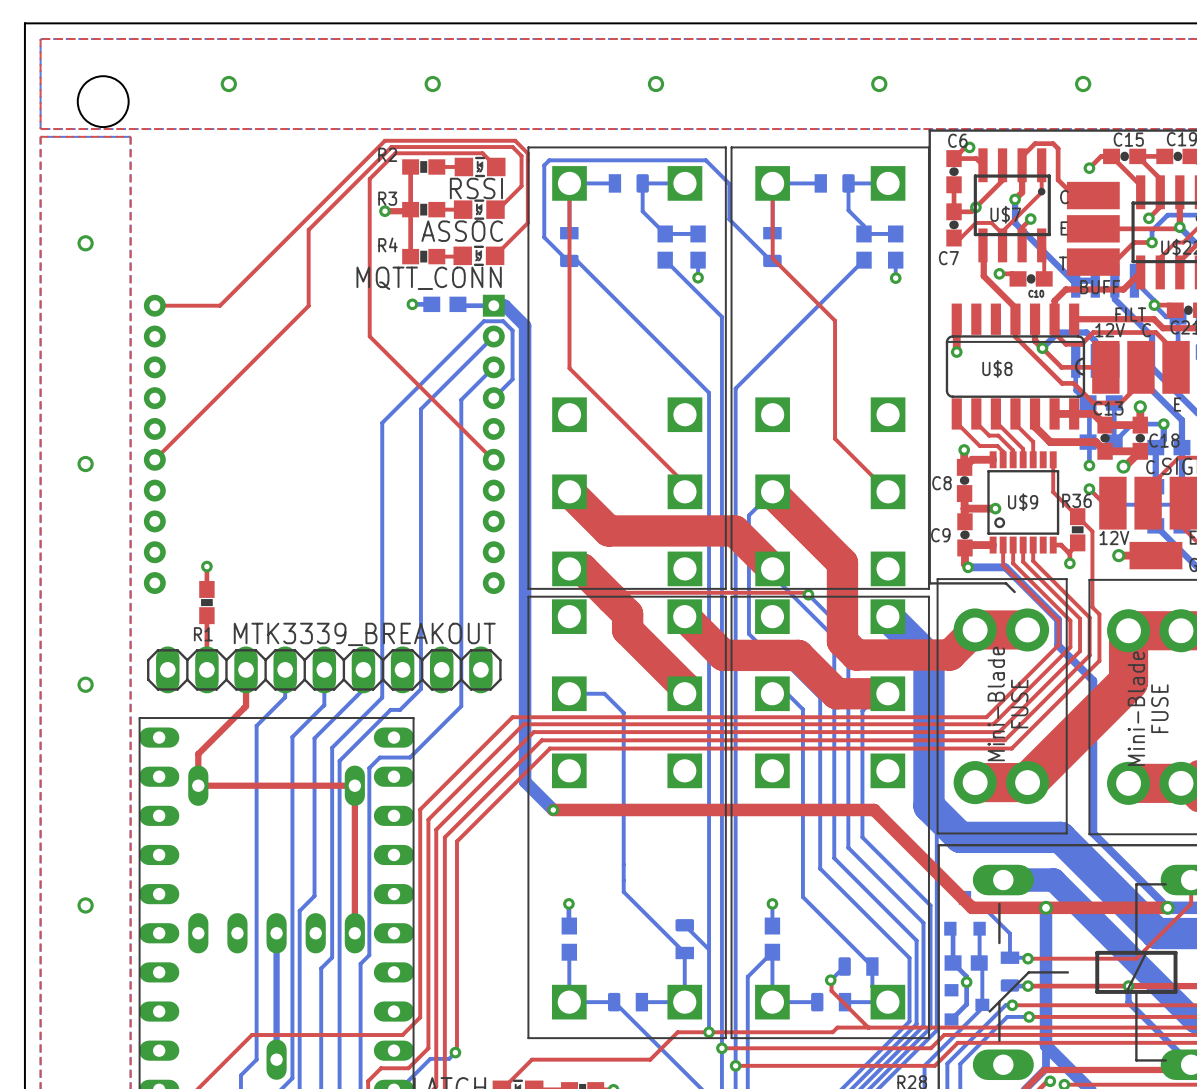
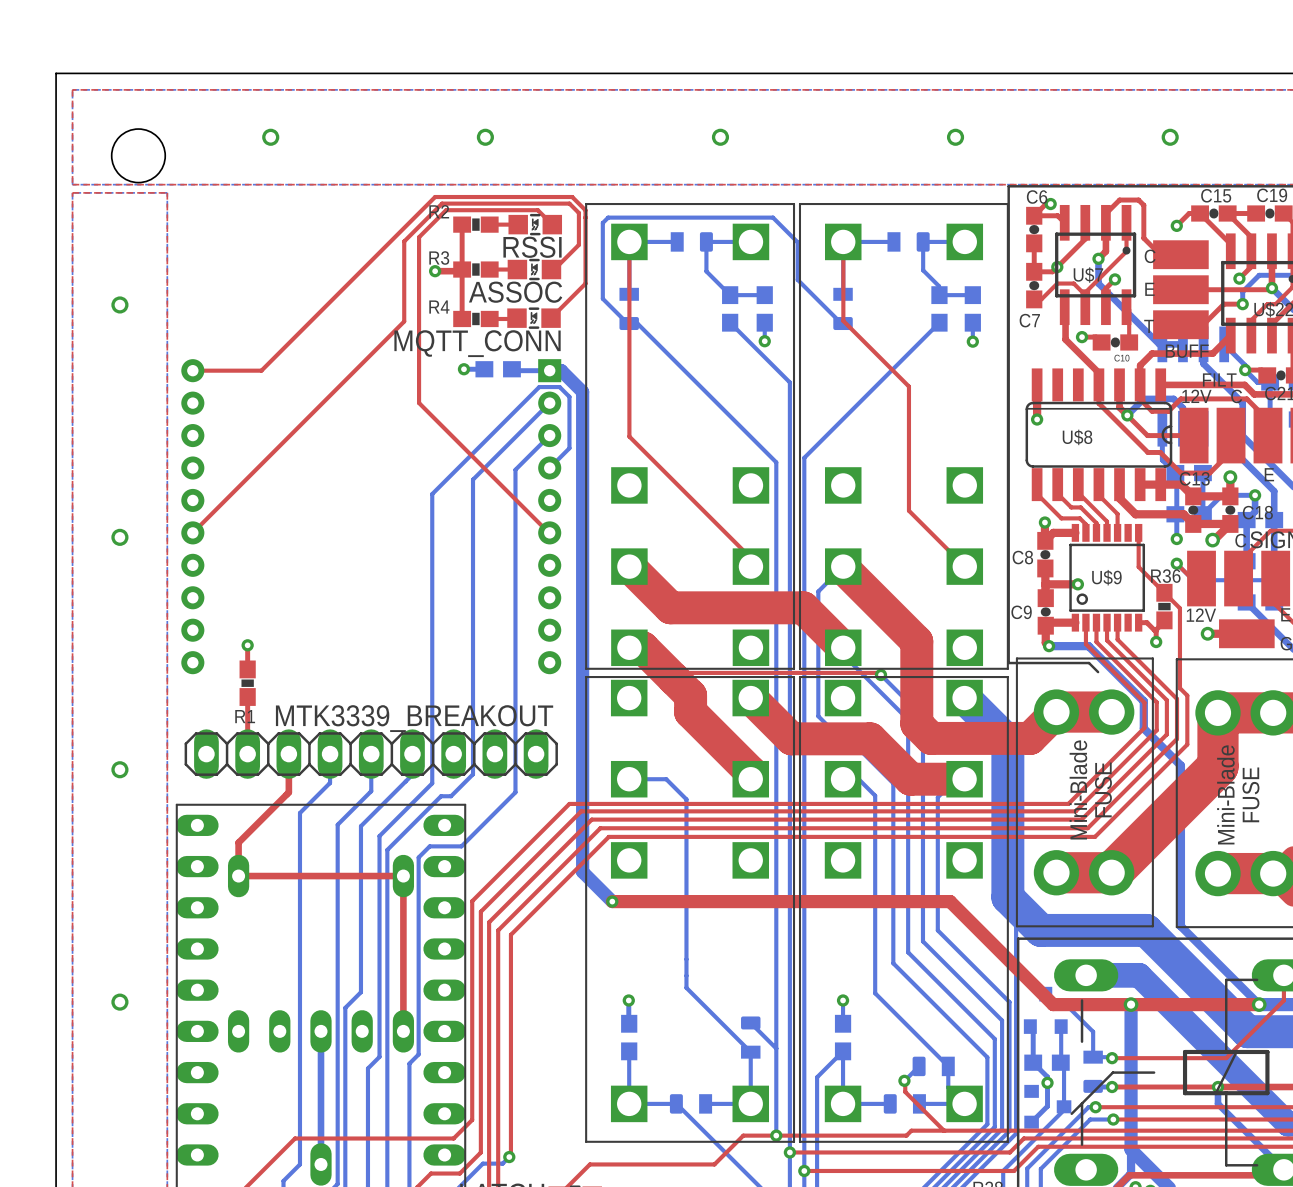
top track: (355, 182) (308, 229) (308, 305) -> (404, 241) (404, 321) (354, 370)

